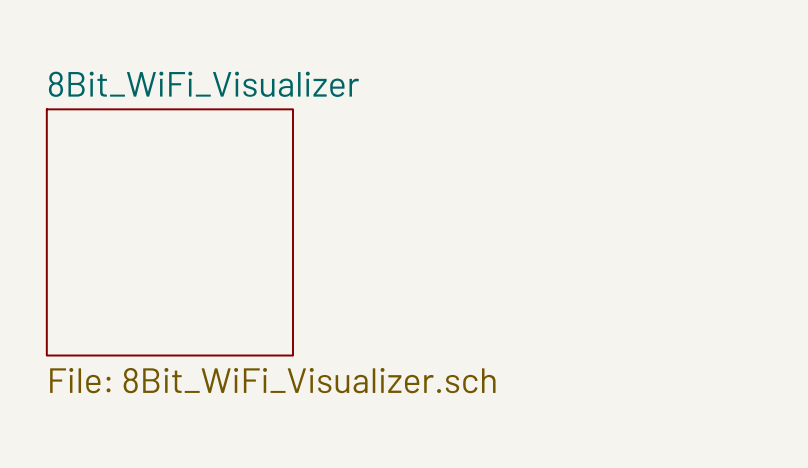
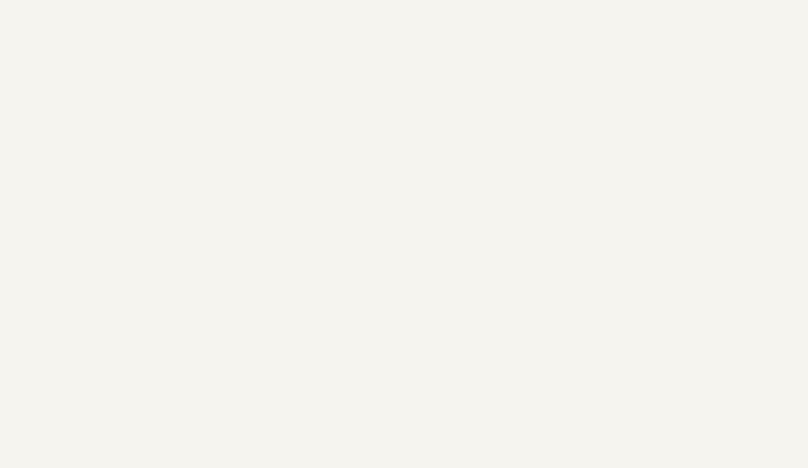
sheet 8Bit_WiFi_Visualizer: File: 8Bit_WiFi_Visualizer.sch (169, 232) -> none

